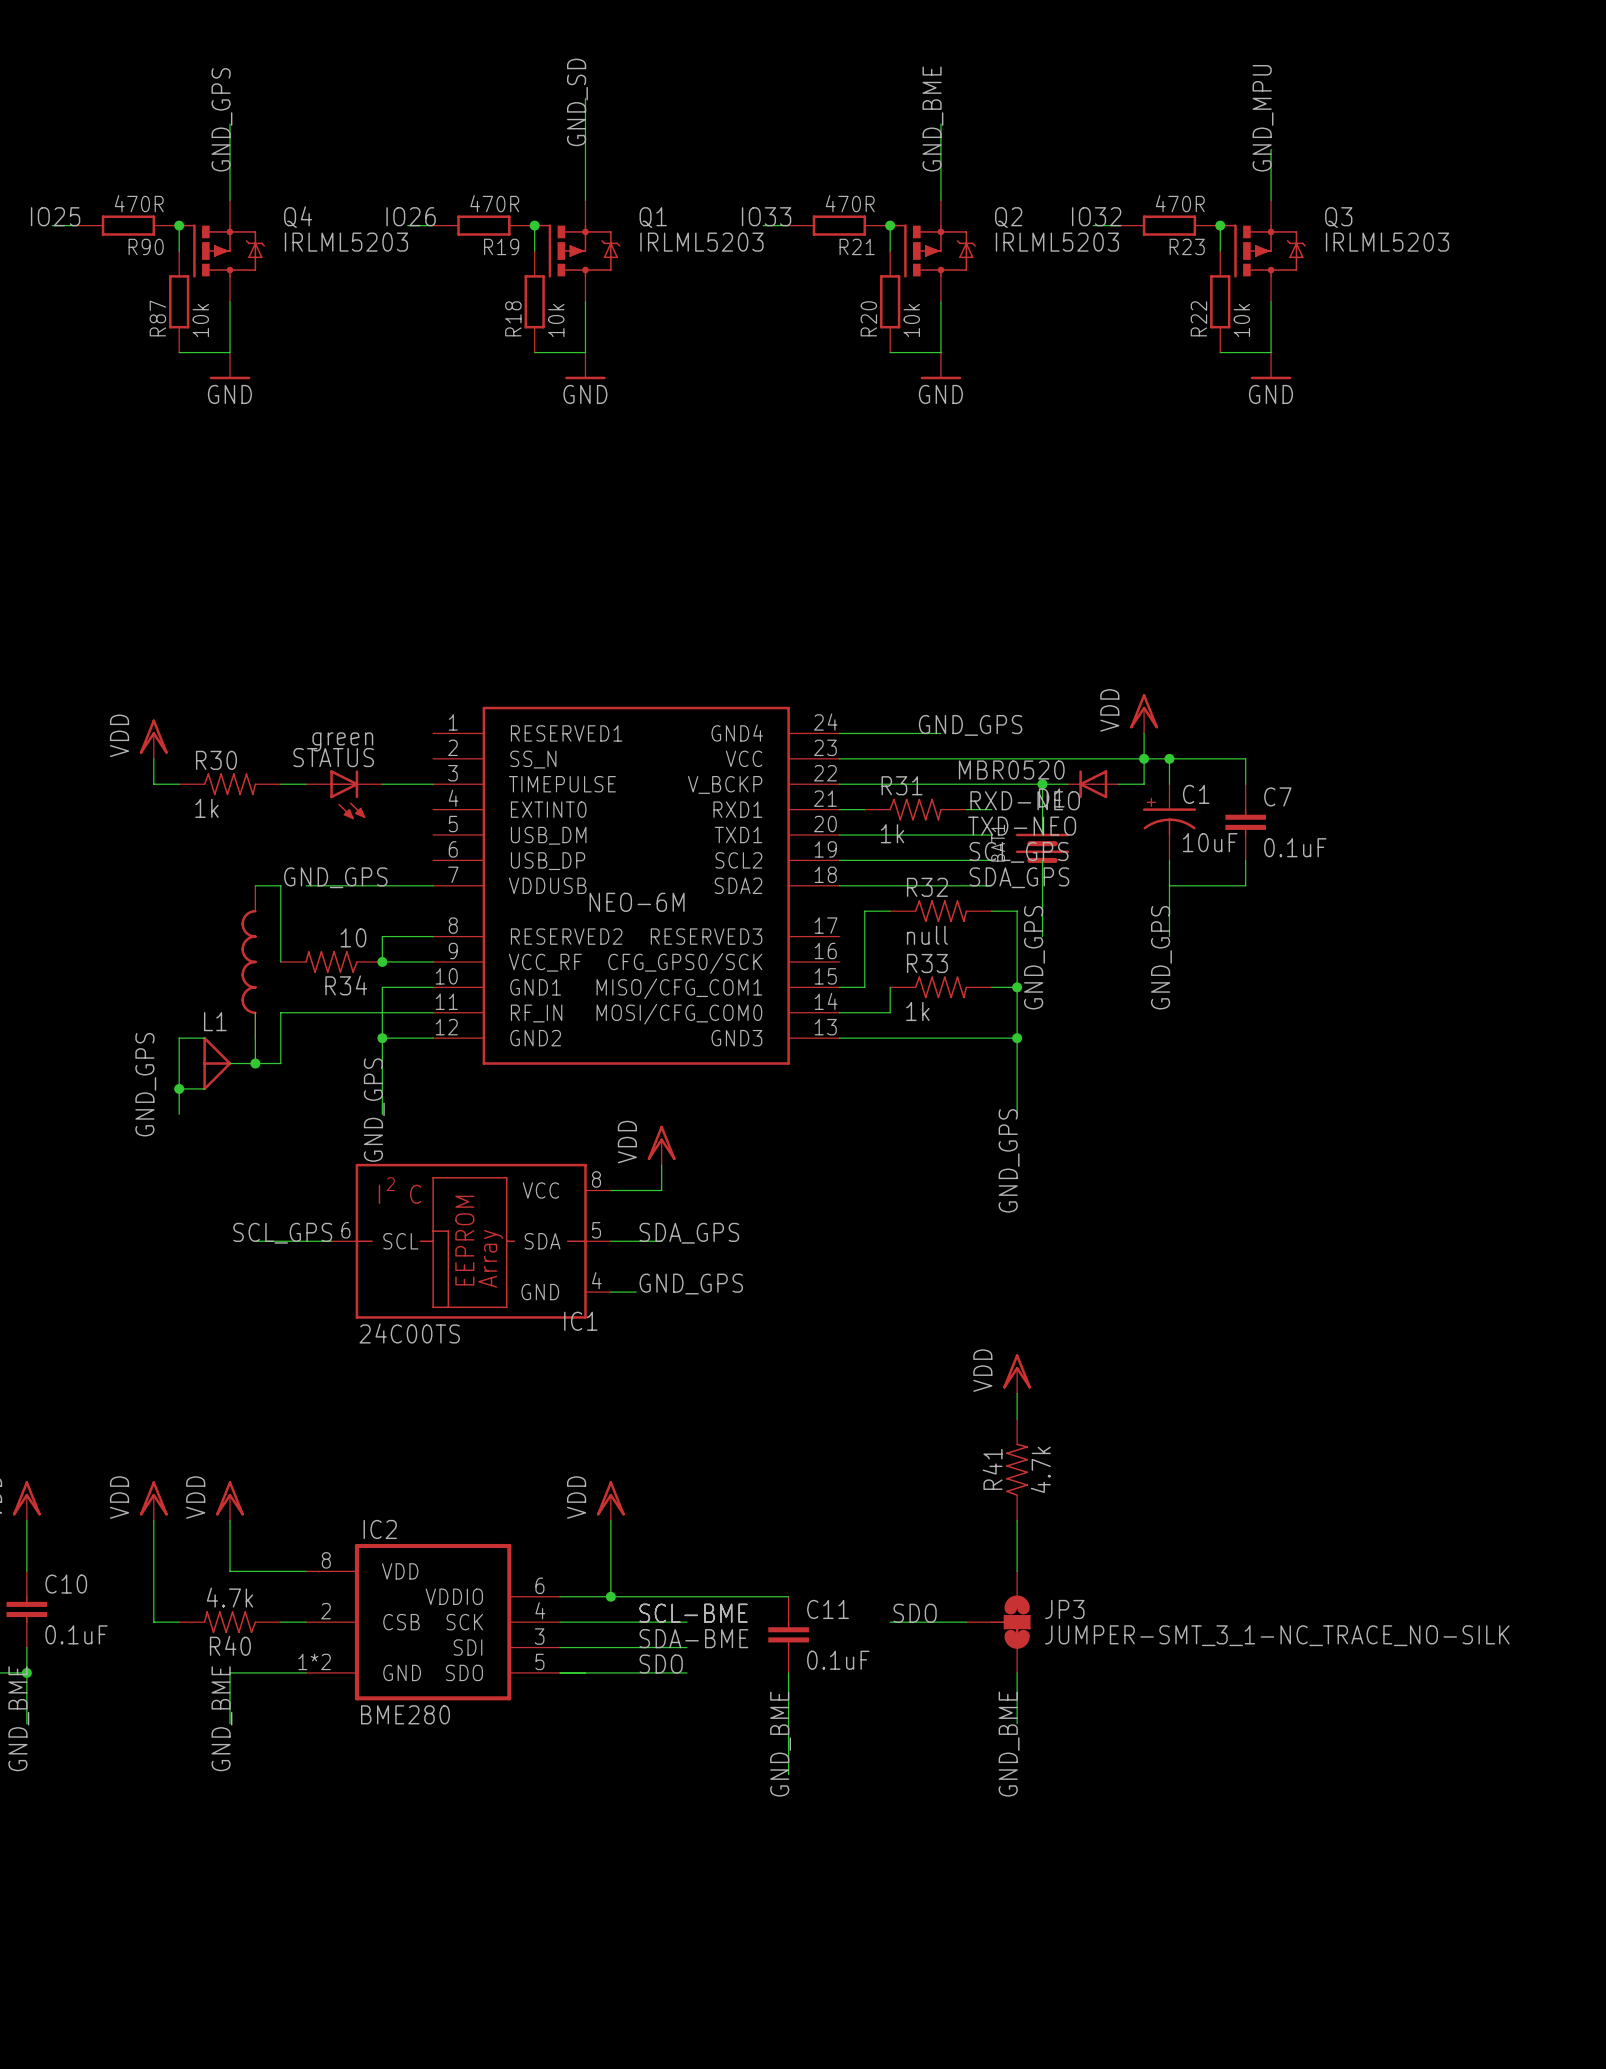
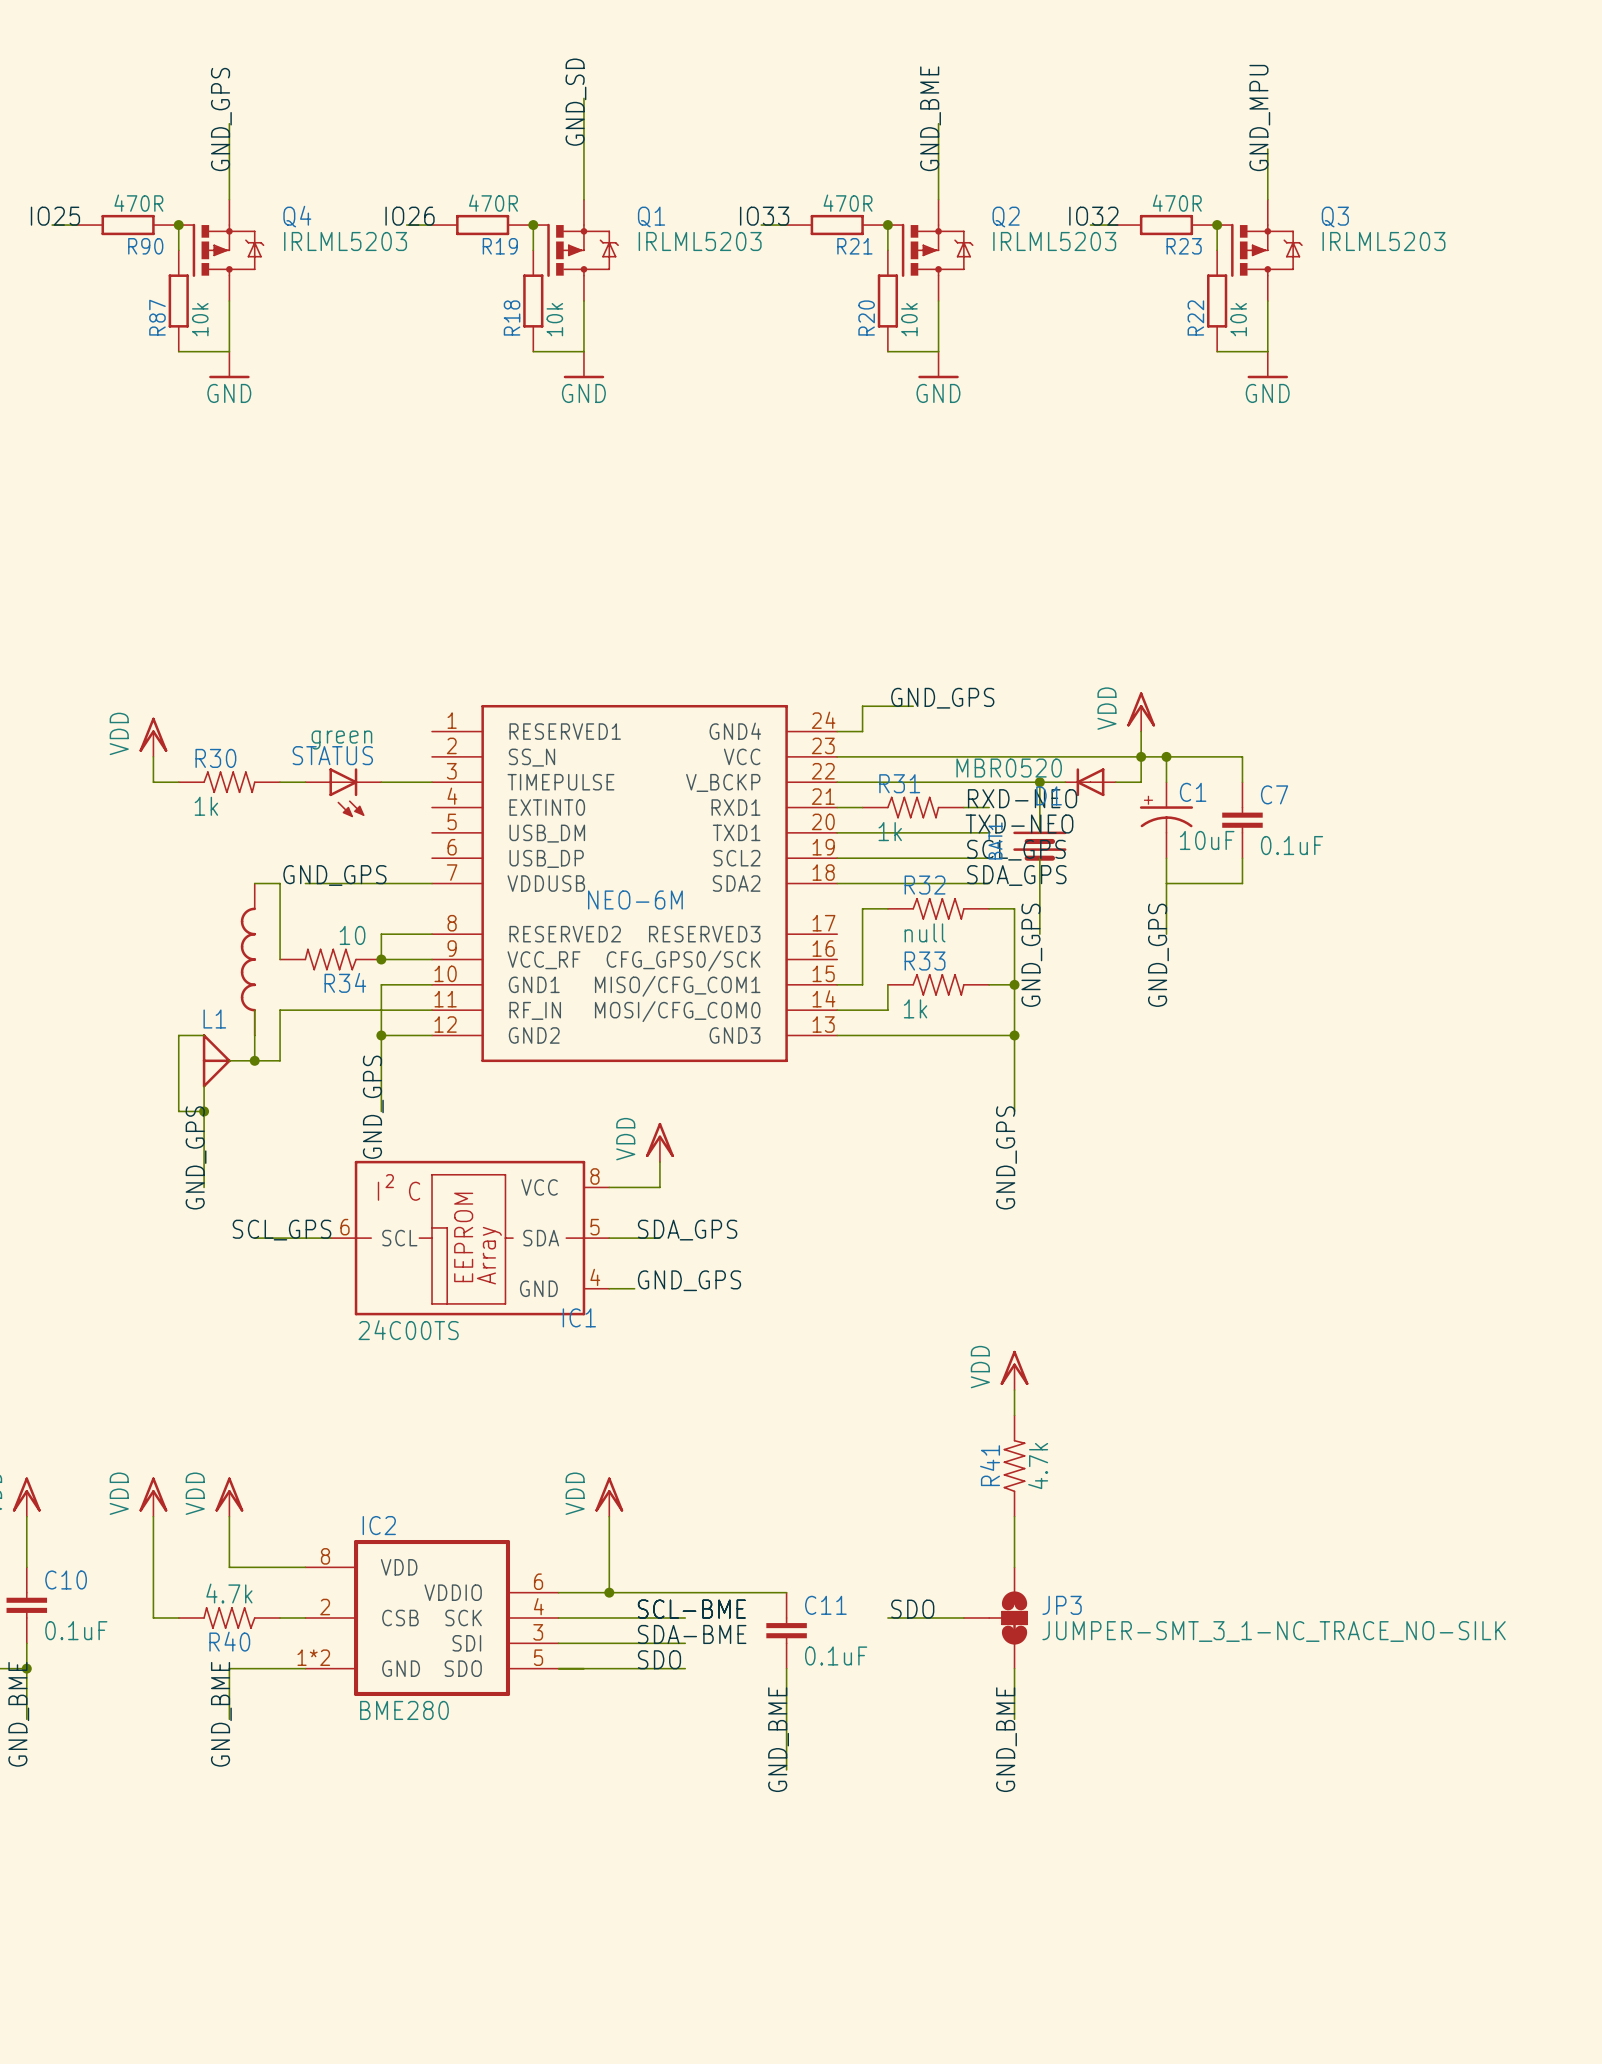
label position: GND_GPS (970, 725) -> GND_GPS (942, 698)
wire: (864, 733) (940, 733) -> (862, 731) (862, 706) (913, 706)
label position: GND_GPS (145, 1084) -> GND_GPS (196, 1157)
wire: (179, 1088) (204, 1088) -> (204, 1187) (204, 1086)
junction position: (179, 1088) -> (204, 1111)
wire: none -> (178, 1111) (204, 1111)

